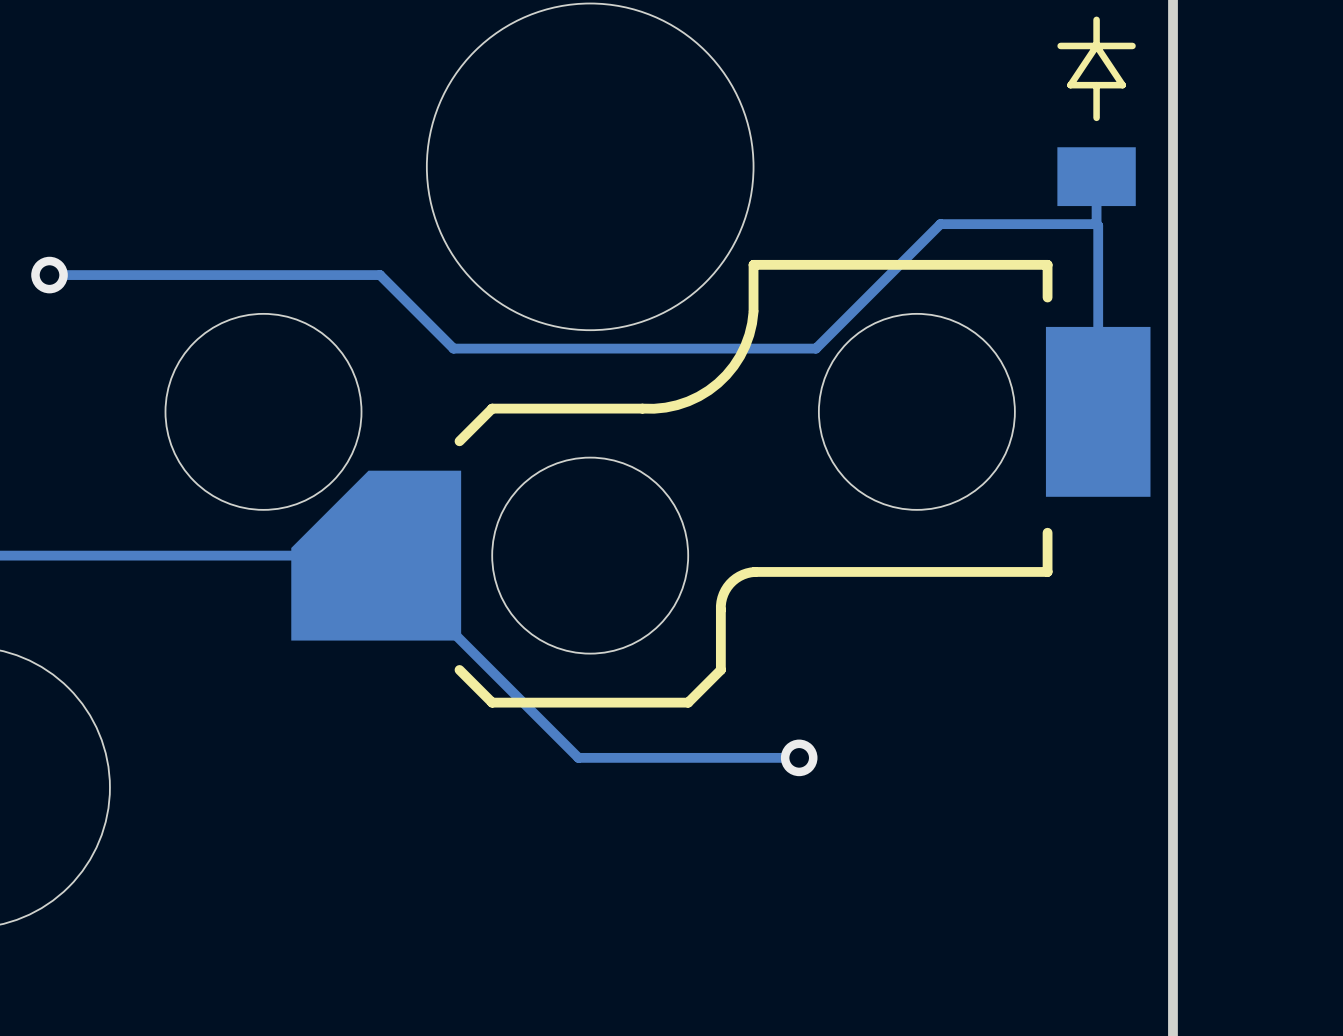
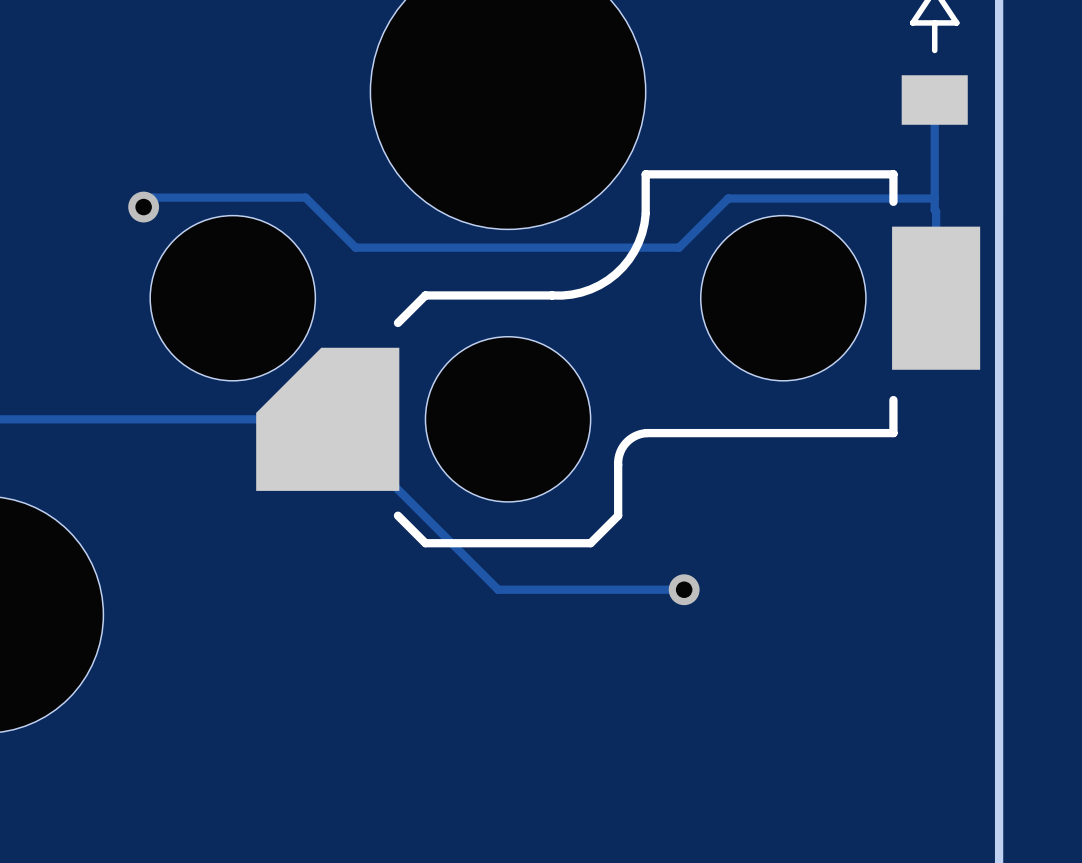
track: (49, 275) (380, 275) (453, 348) (815, 348) (940, 224) (1096, 224) (1098, 225) (1098, 308) -> (934, 140) (936, 211)
via position: (49, 275) -> (143, 207)
track: none -> (934, 198) (728, 198) (679, 247) (355, 247) (305, 197) (153, 197) (143, 207)

